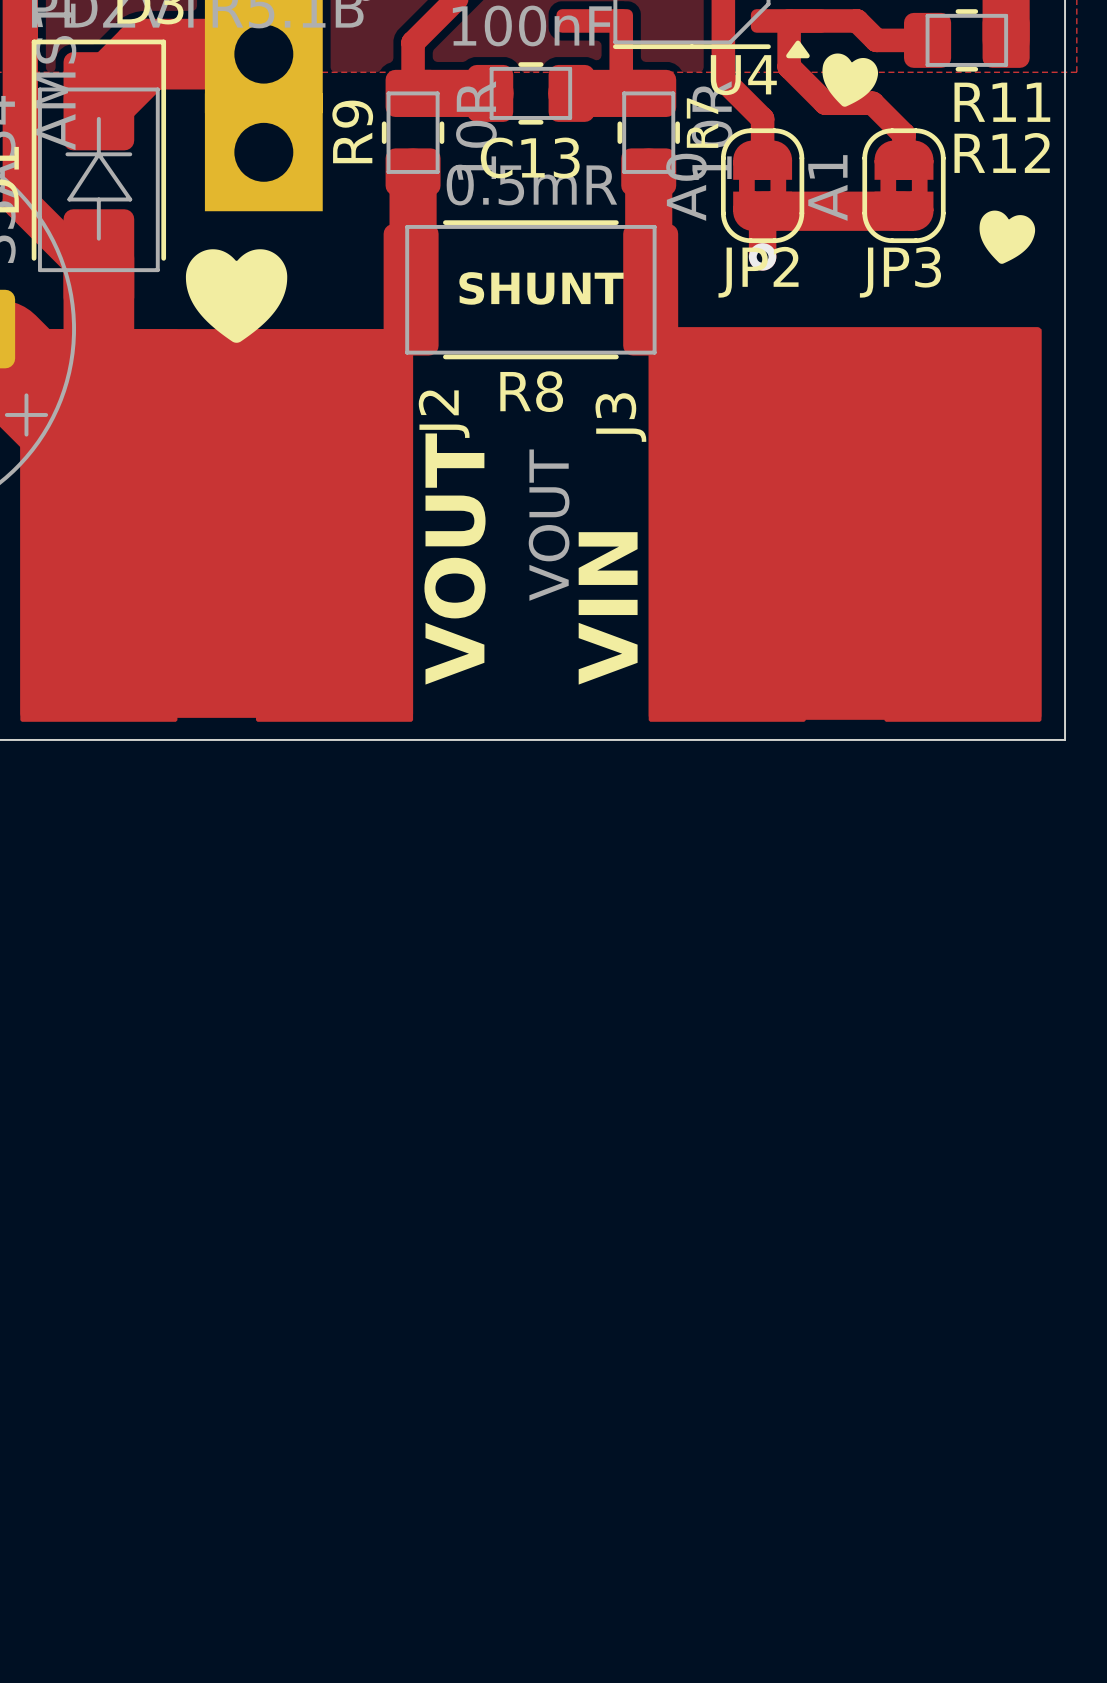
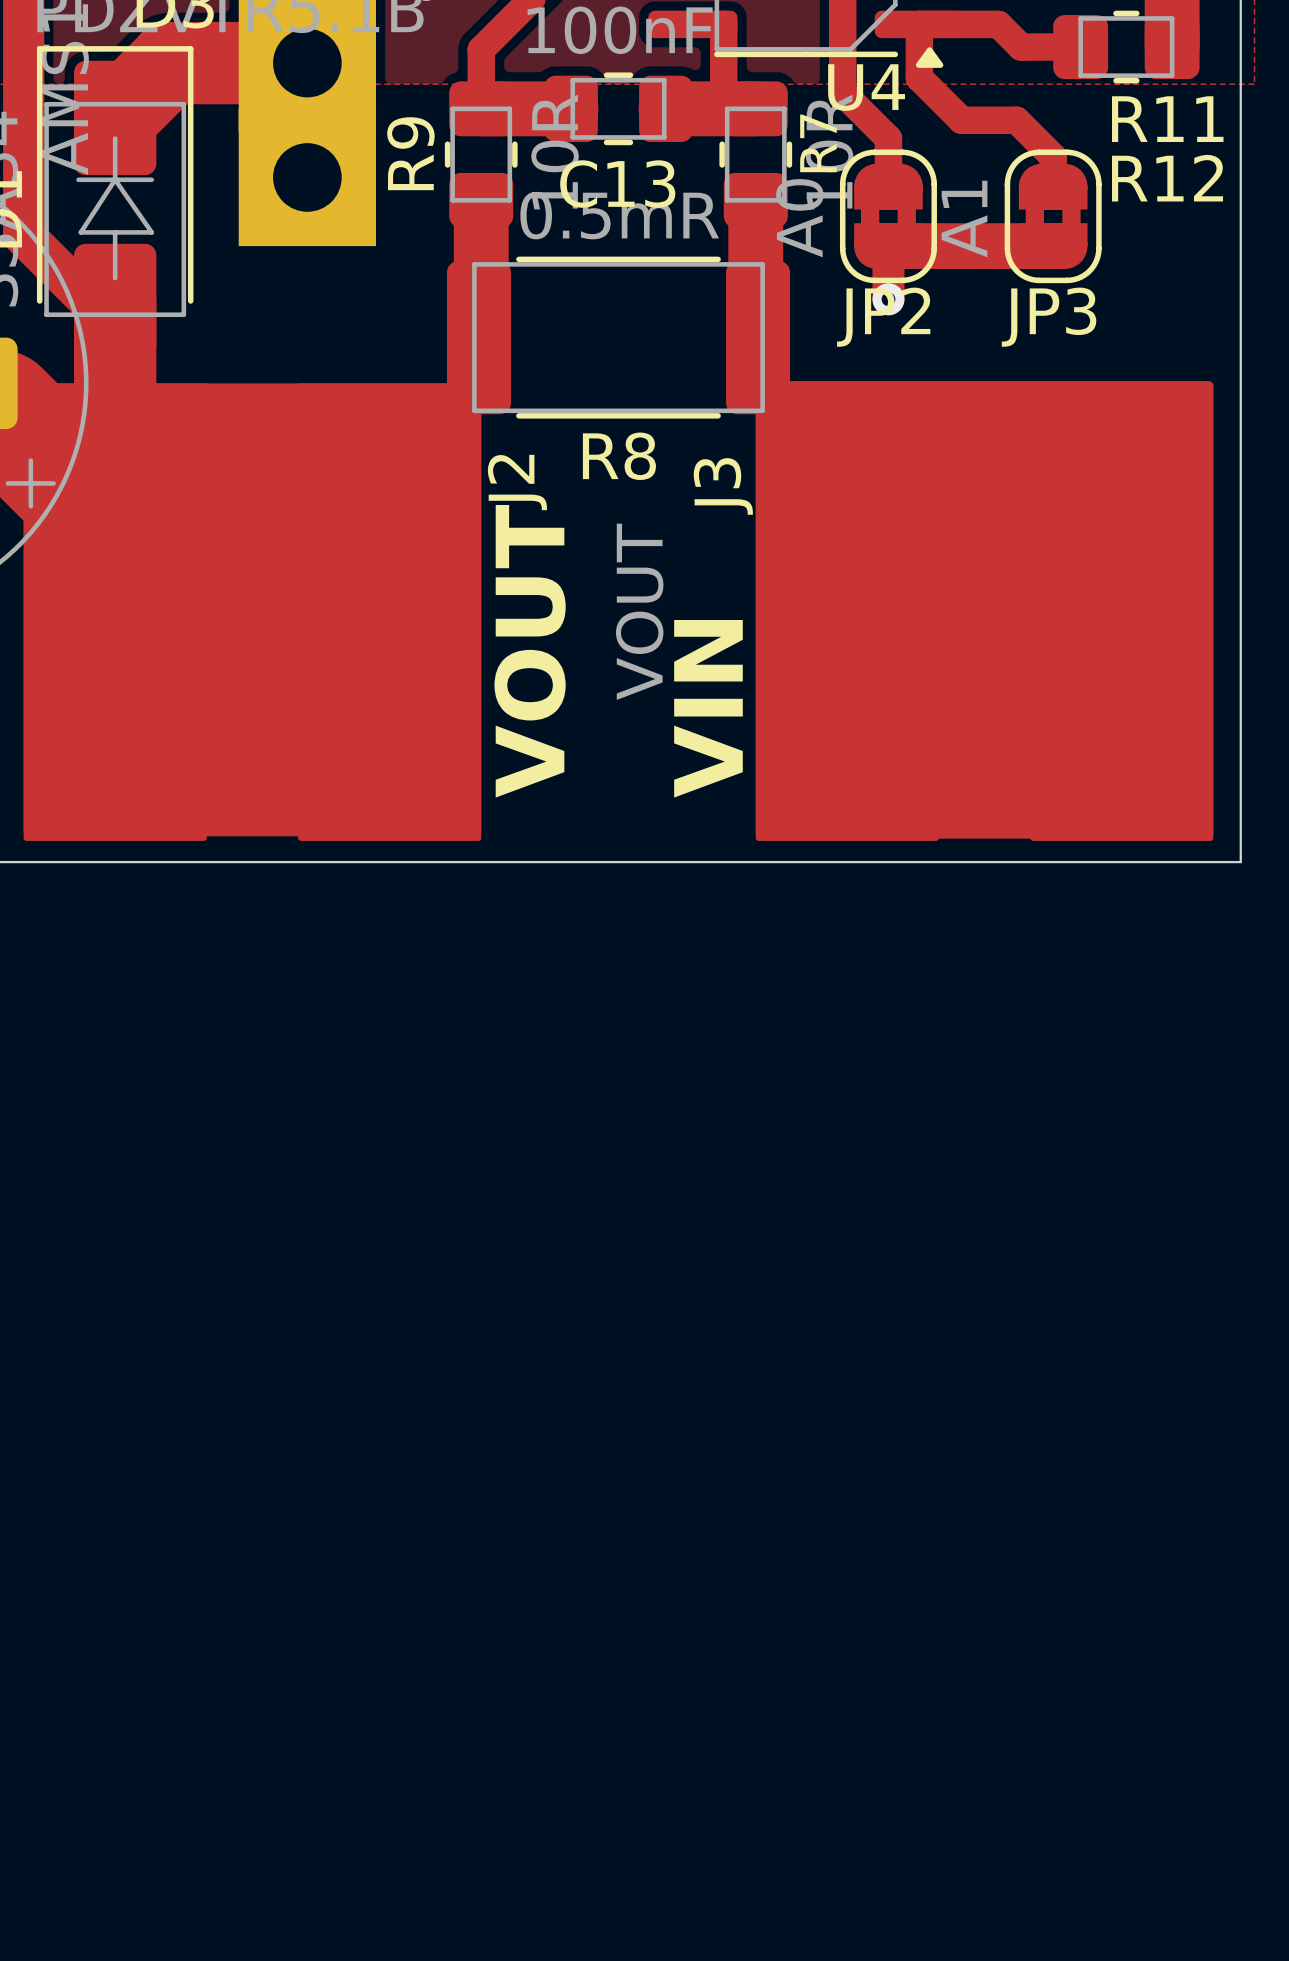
drawing: [822, 53, 879, 107] -> none
drawing: [979, 210, 1036, 264] -> none
drawing: [185, 249, 288, 343] -> none
text: SHUNT (541, 288) -> none

